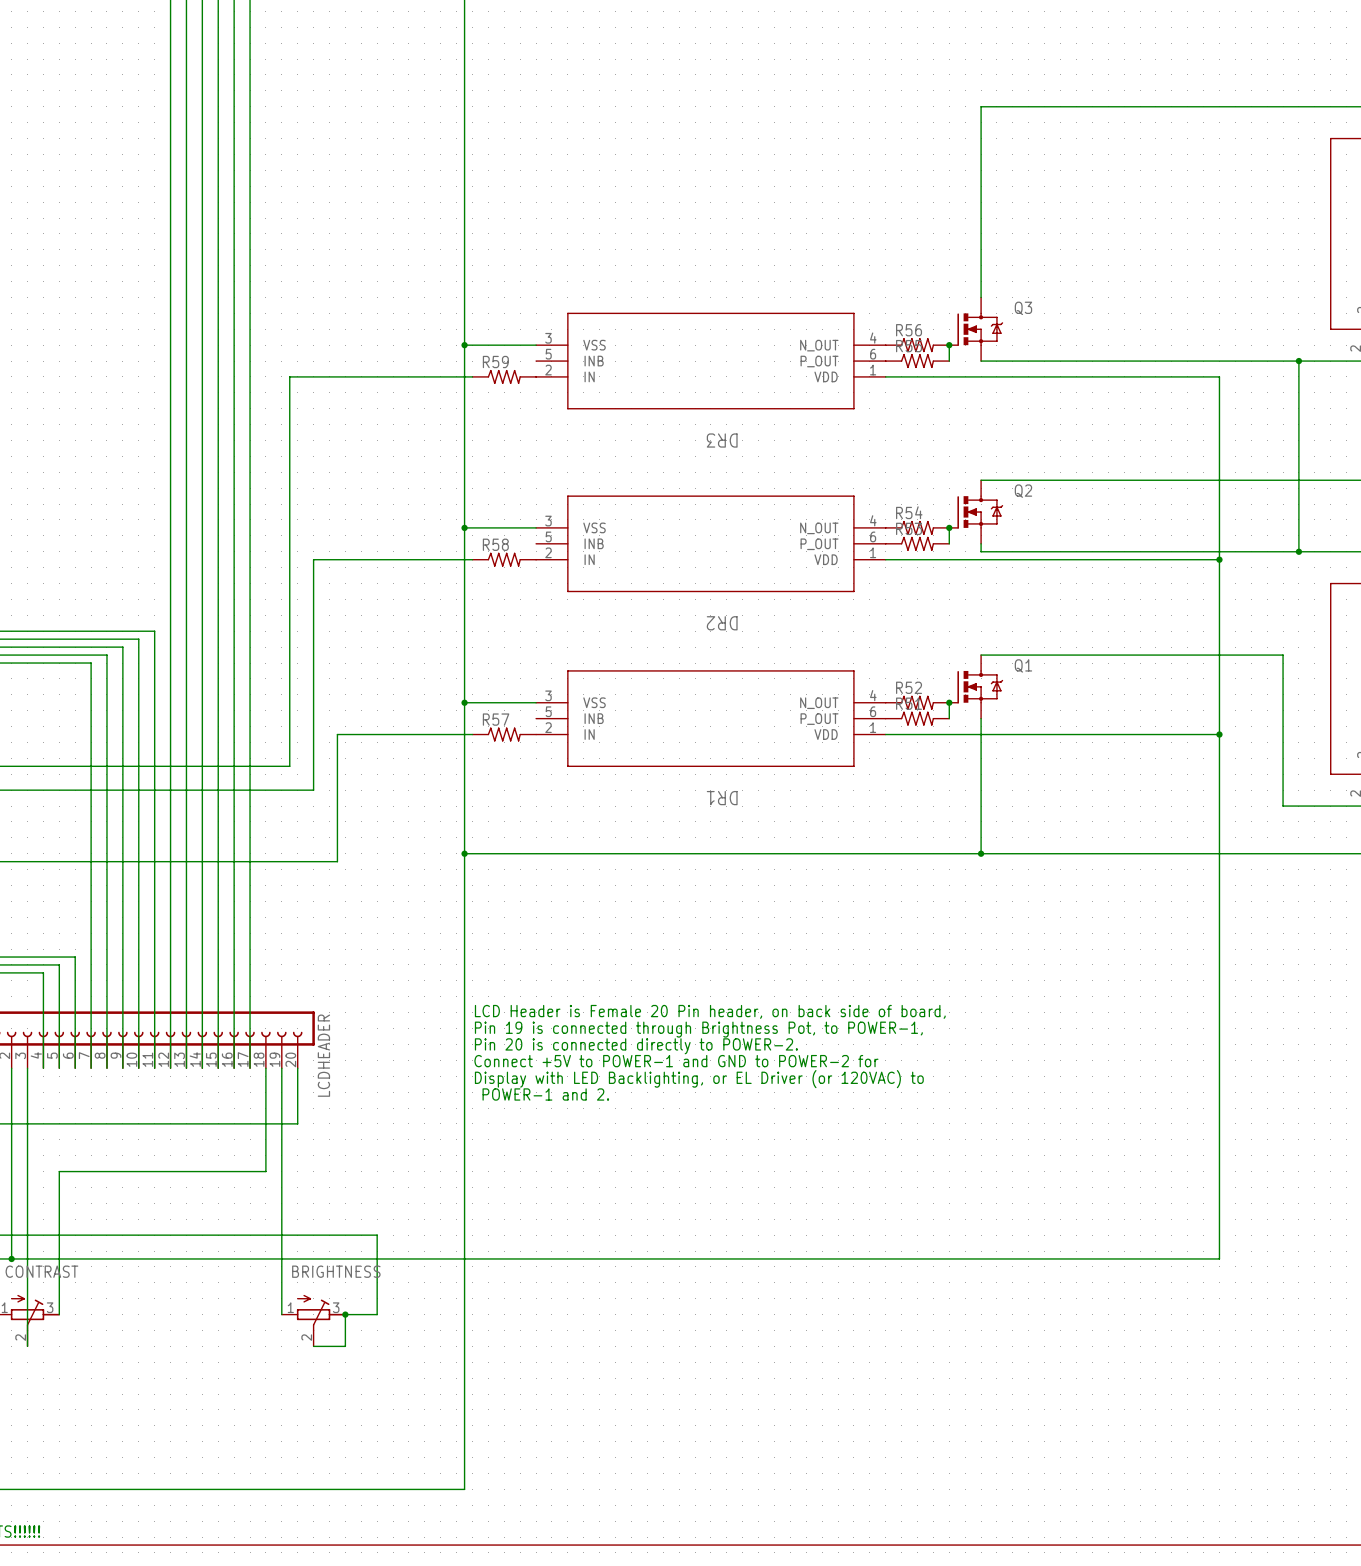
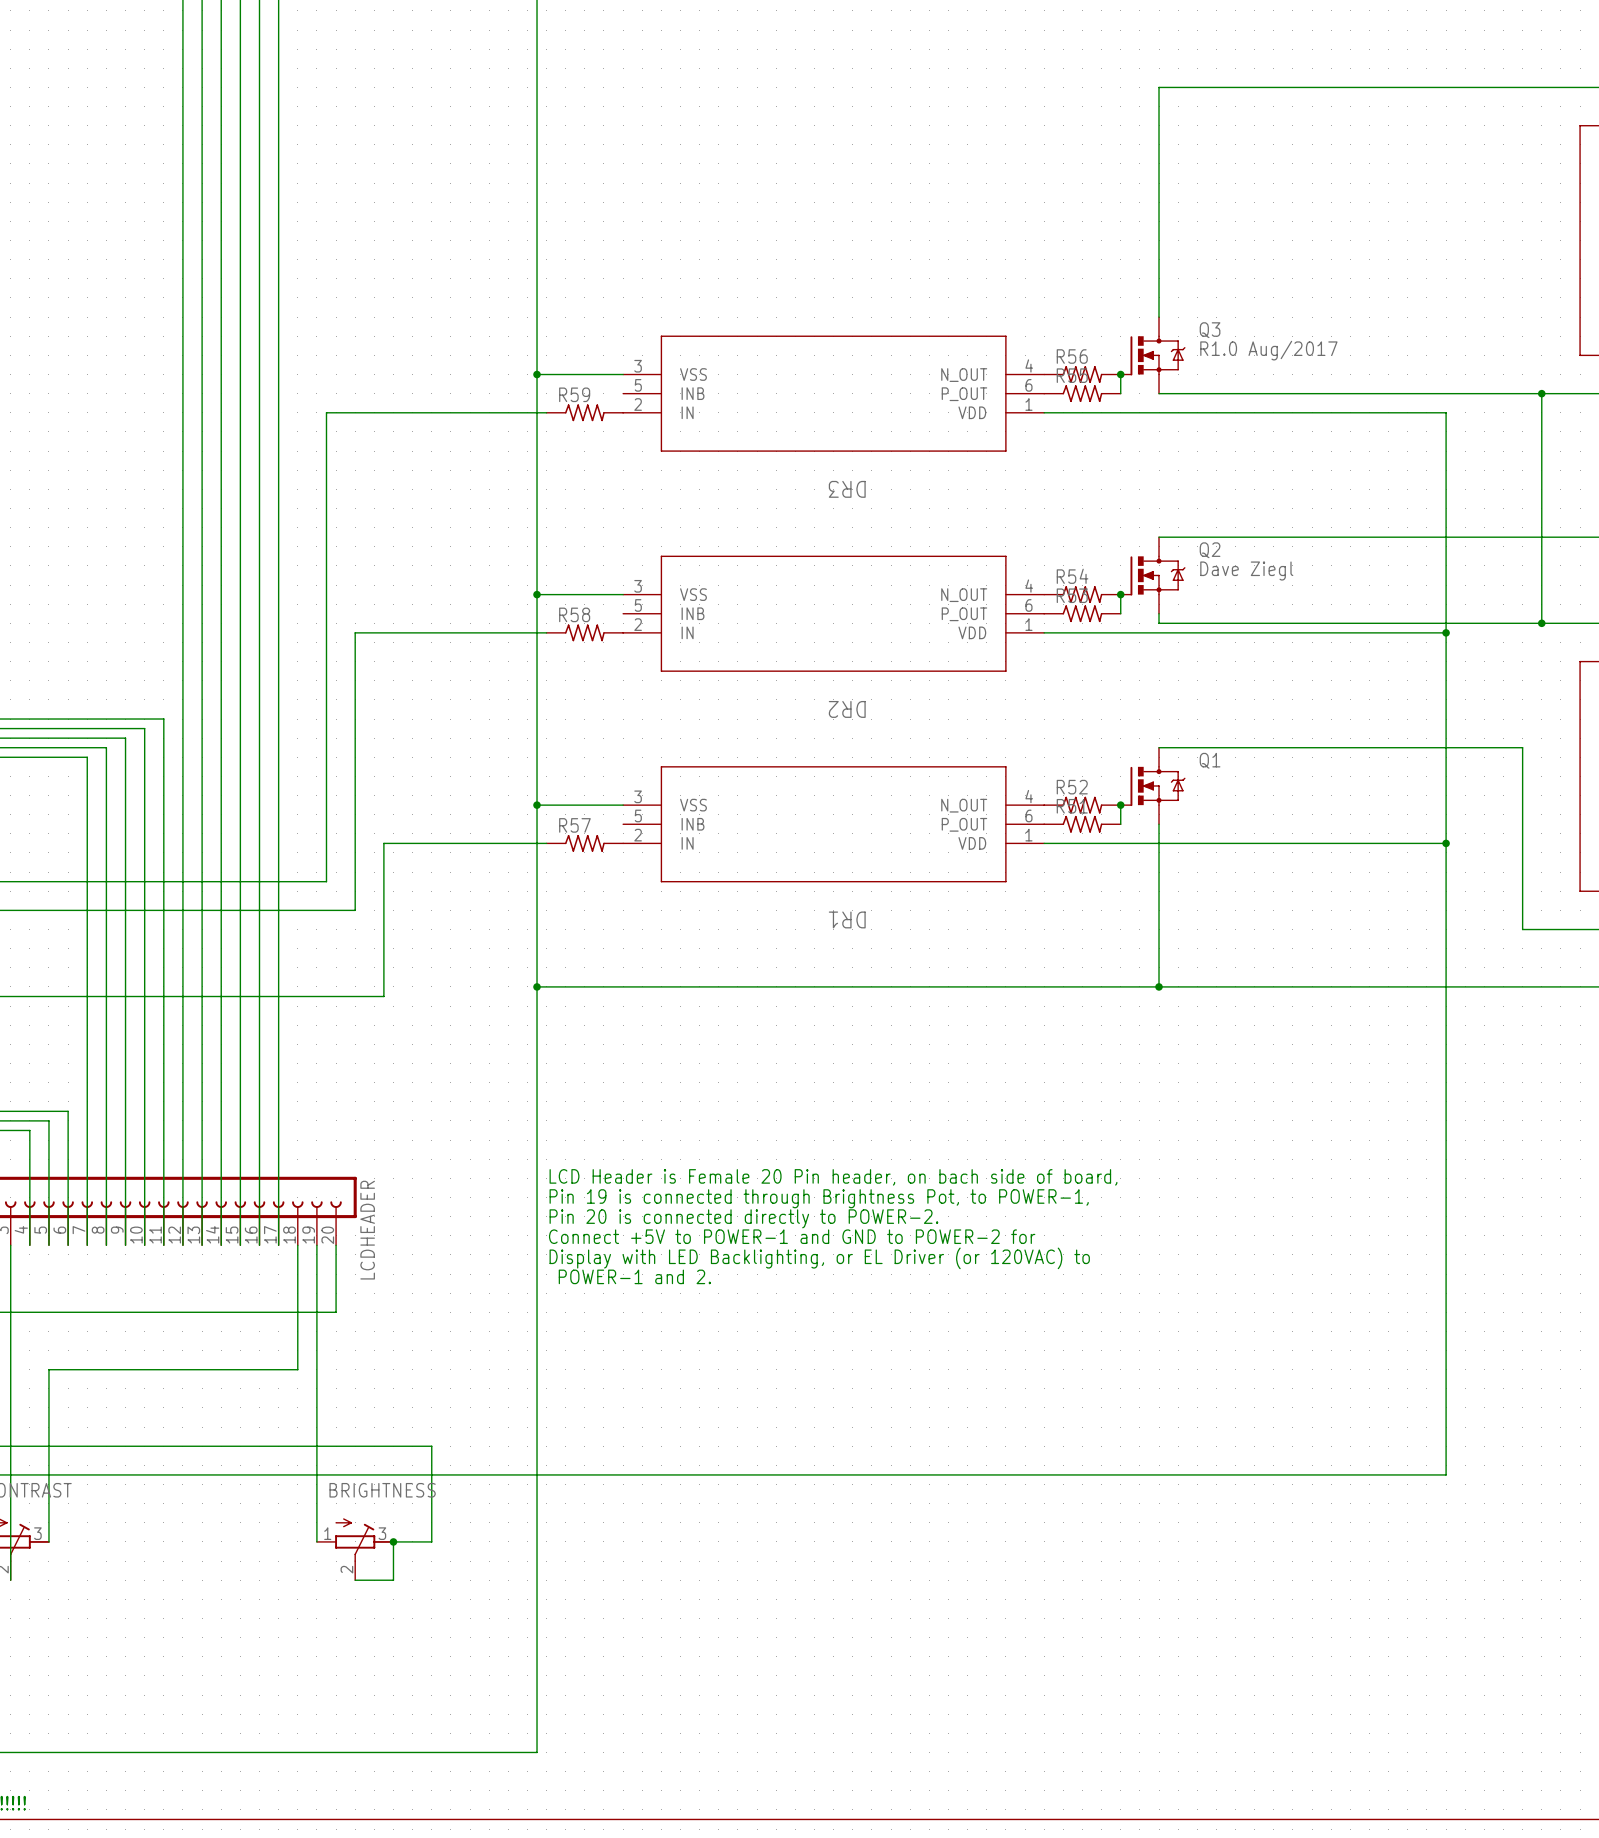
Q3 value: none -> R1.0 Aug/2017 (1268, 350)
Q2 value: none -> Dave Ziegl (1246, 571)
text: LCD Header is Female 20 Pin header, on back side of board, (710, 1011) -> LCD Header is Female 20 Pin header, on bach side of board, (833, 1177)

